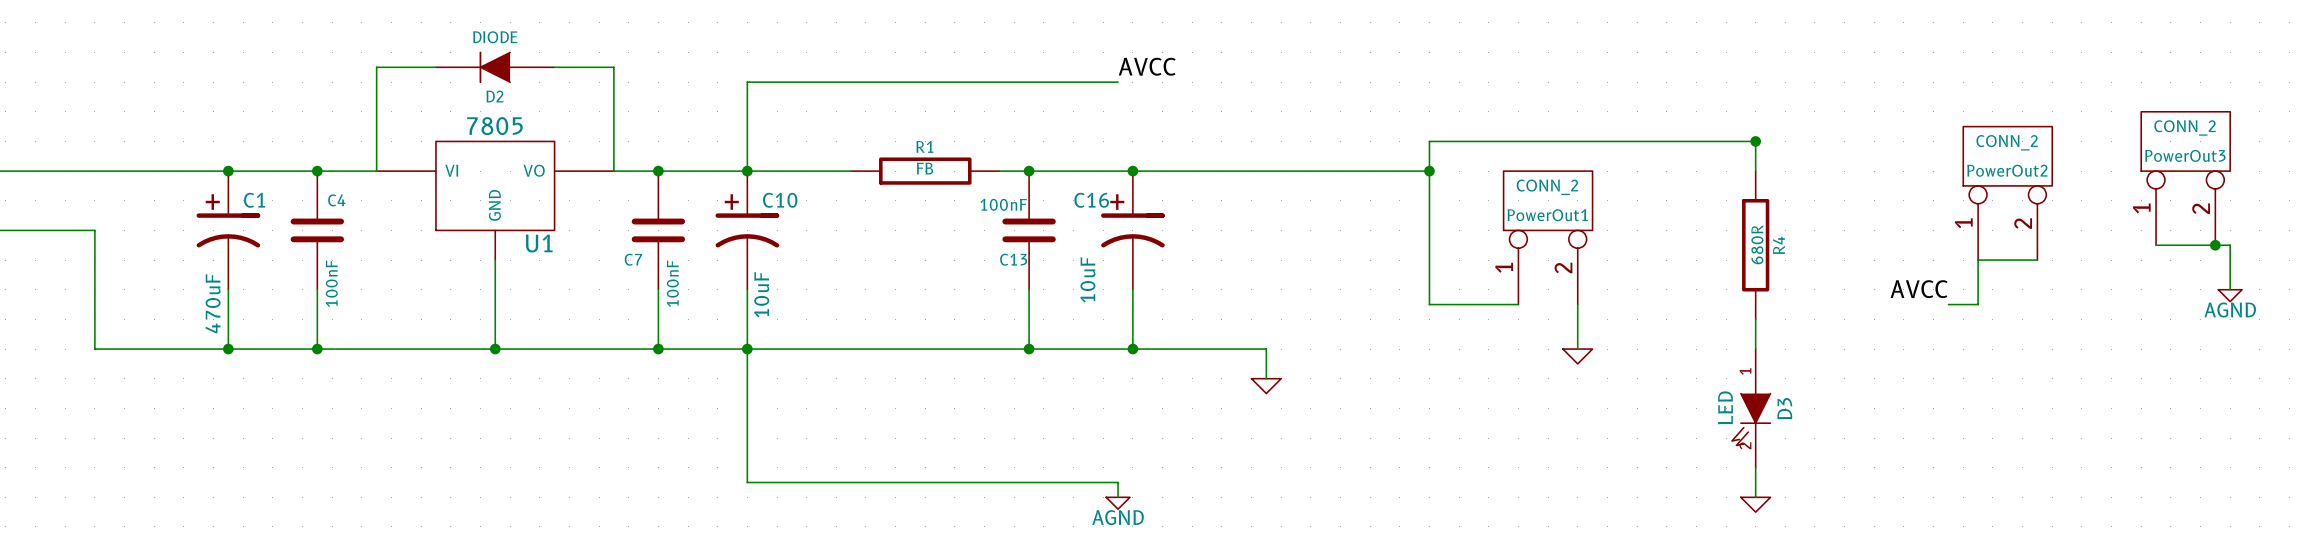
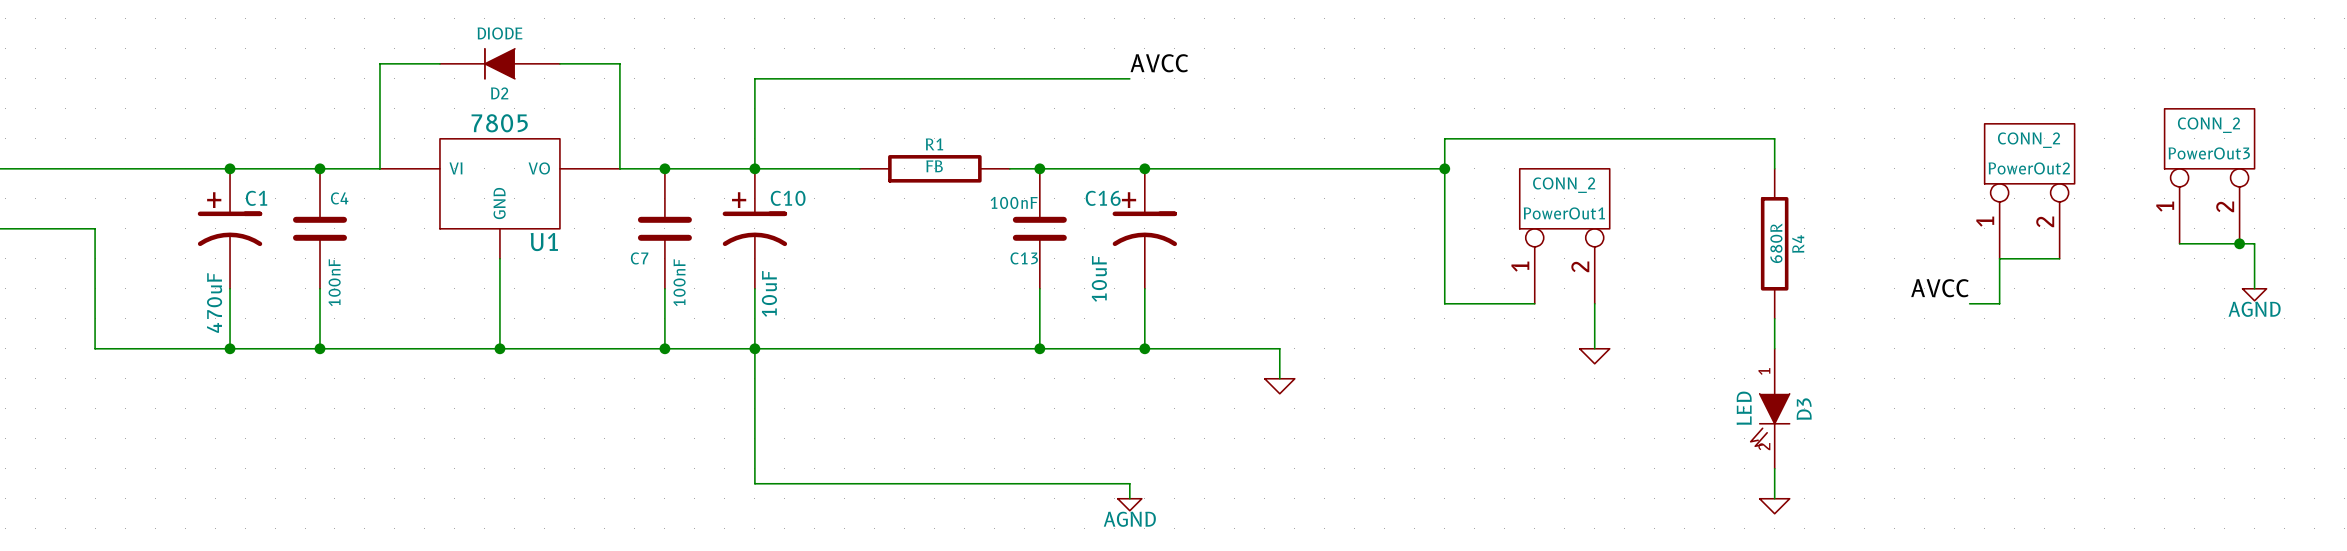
junction: (1755, 141) -> none

